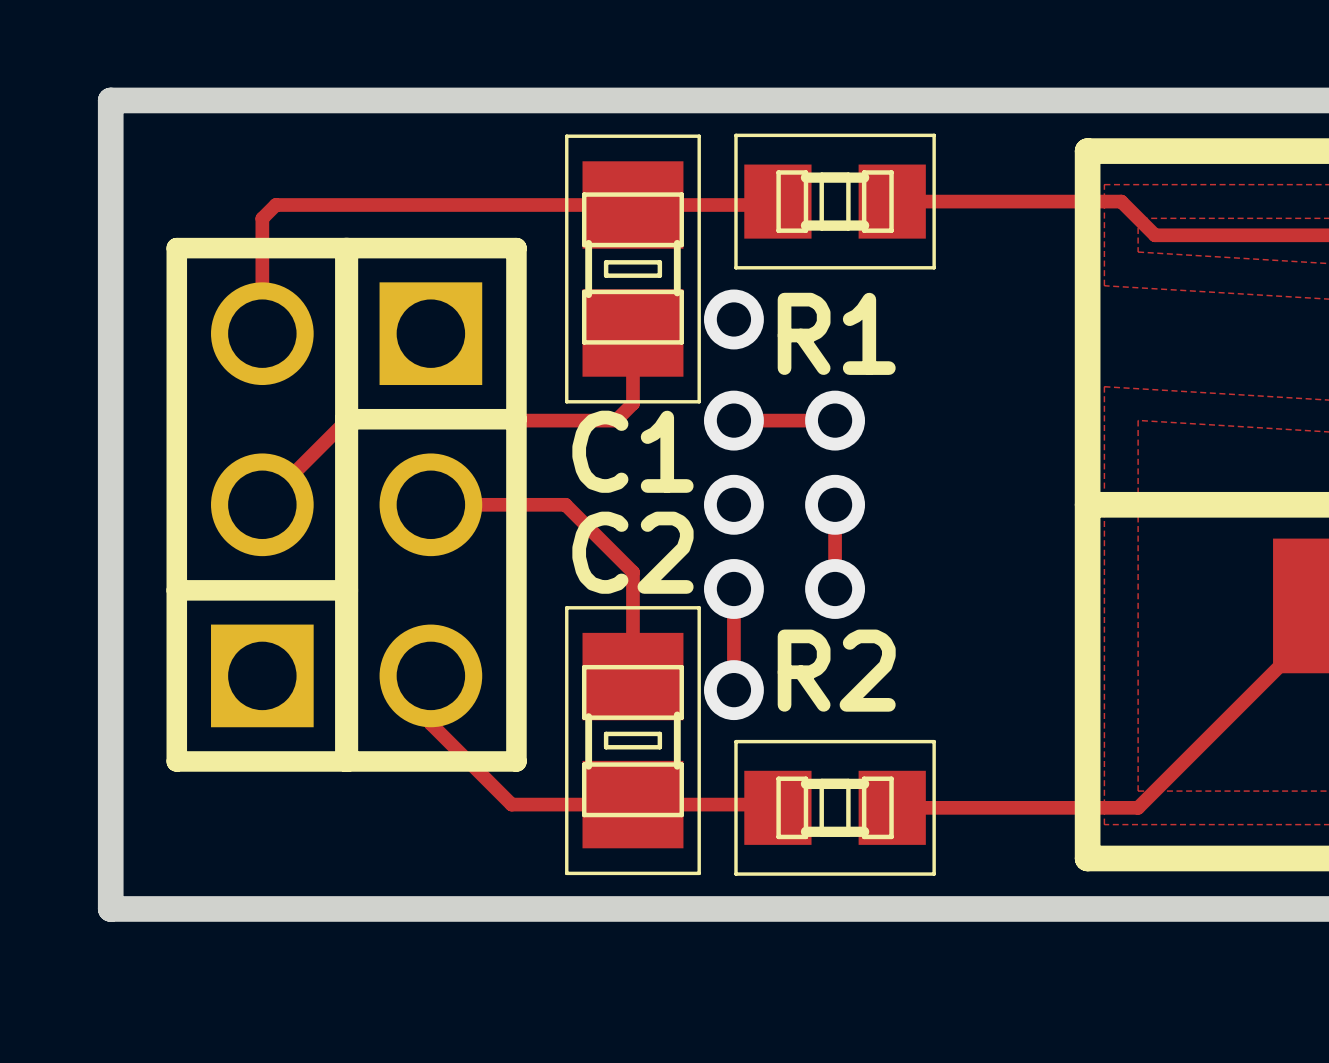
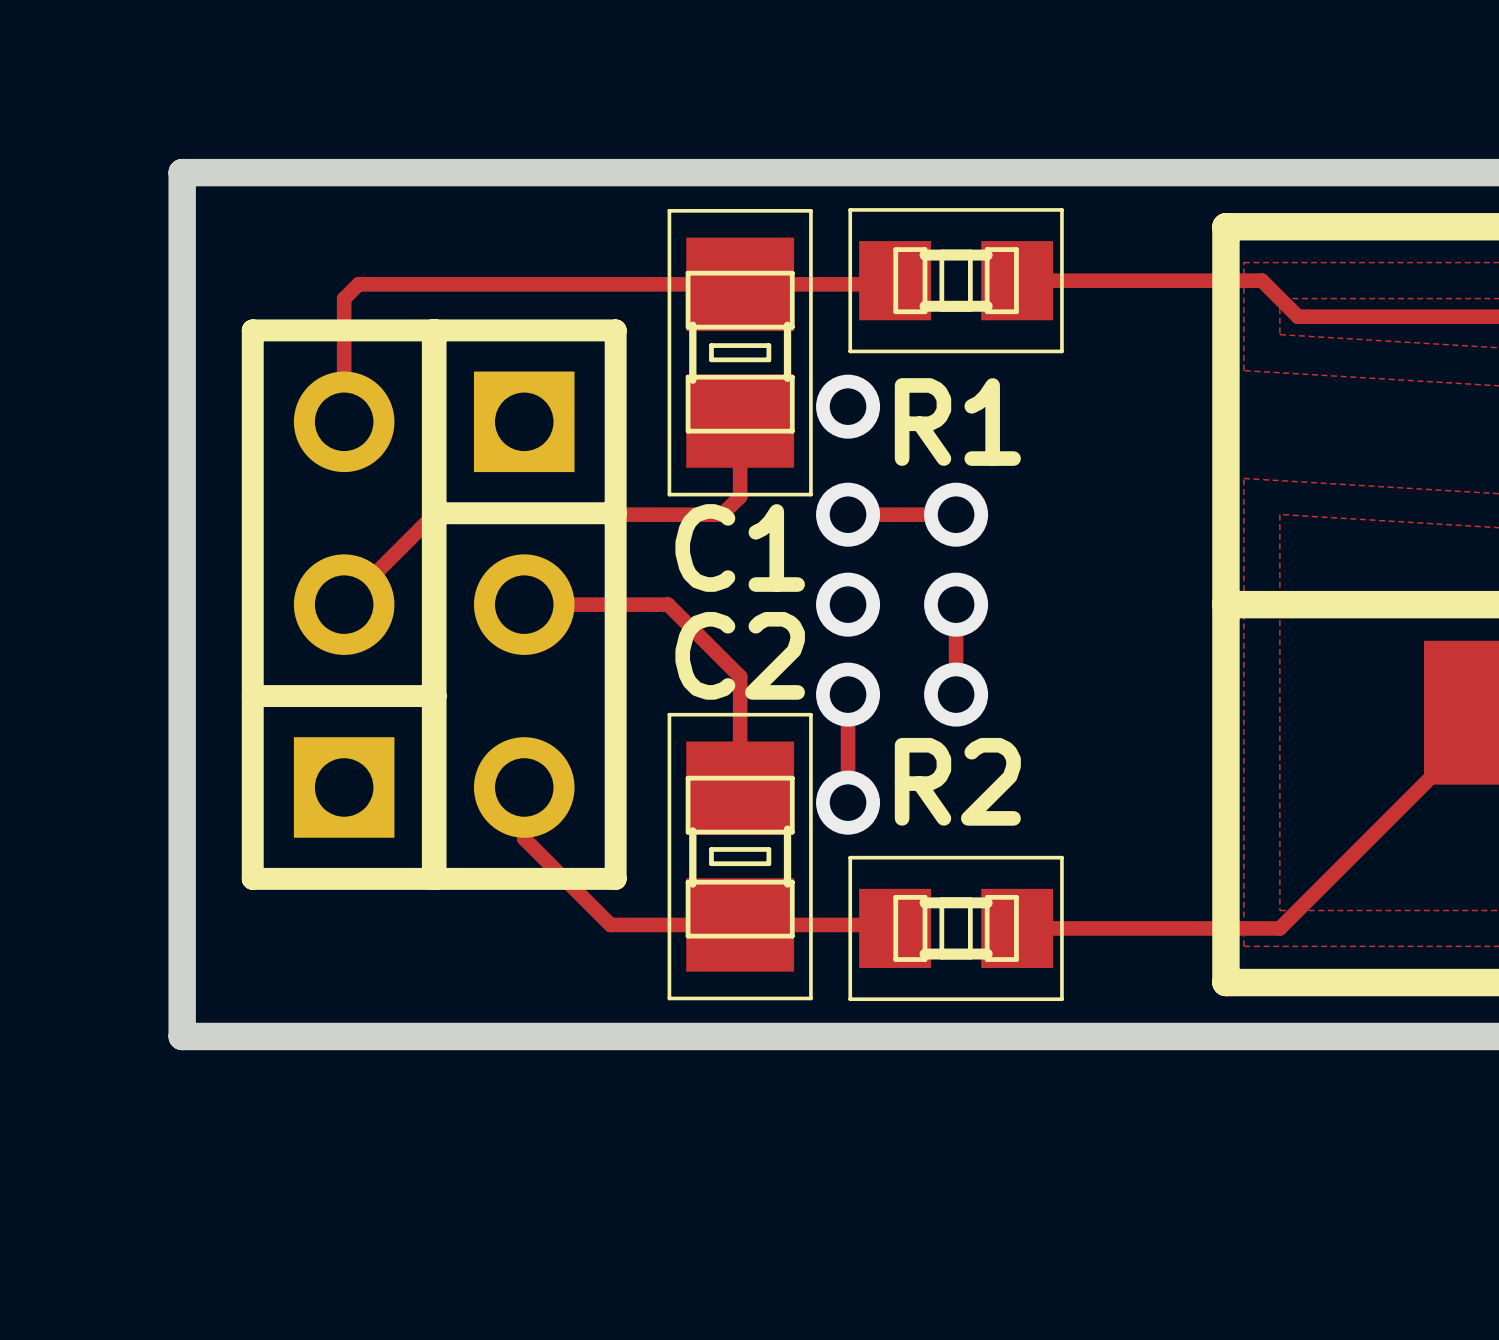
part footprint: [166, 237, 359, 772] -> [241, 319, 447, 890]
part footprint: [335, 237, 527, 772] -> [421, 319, 627, 890]

